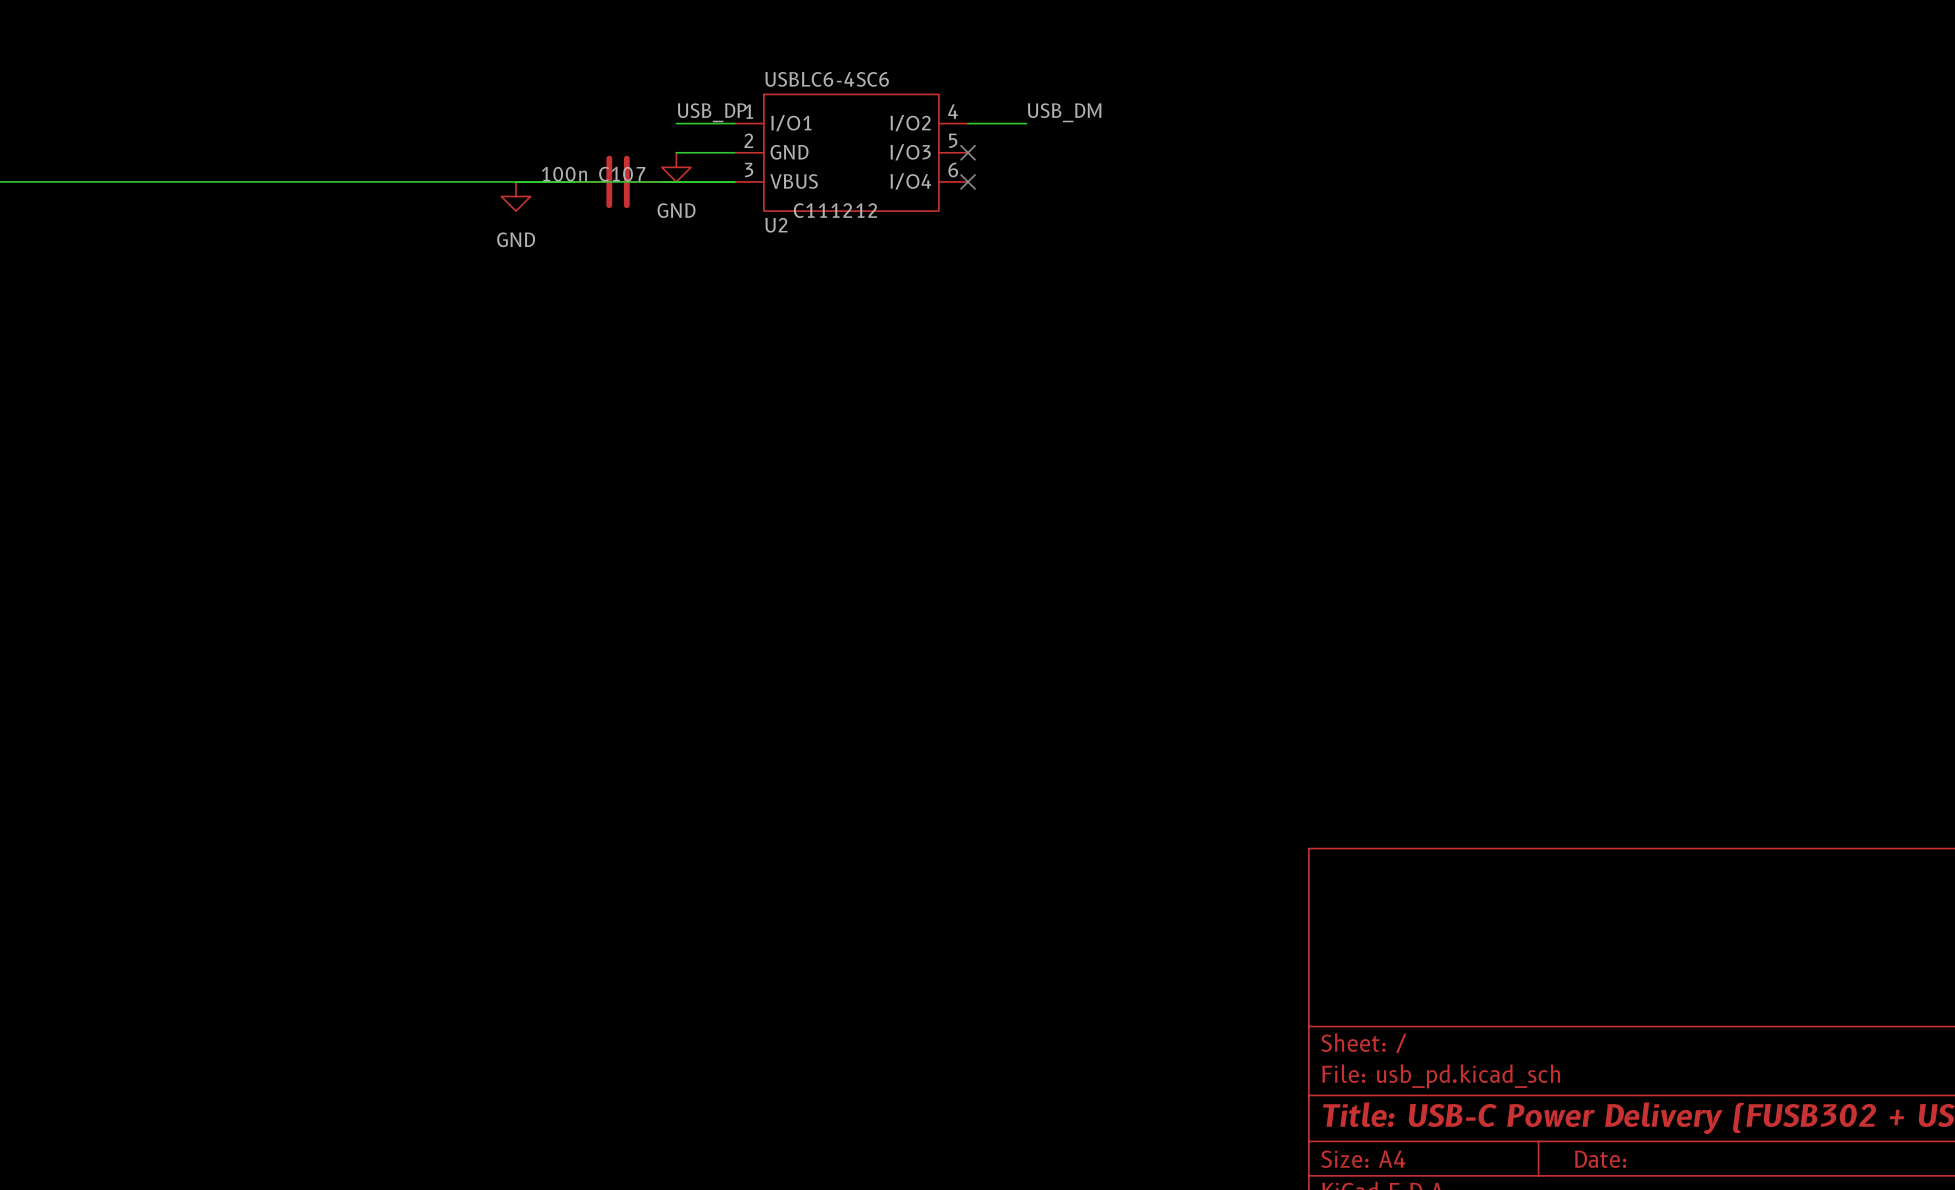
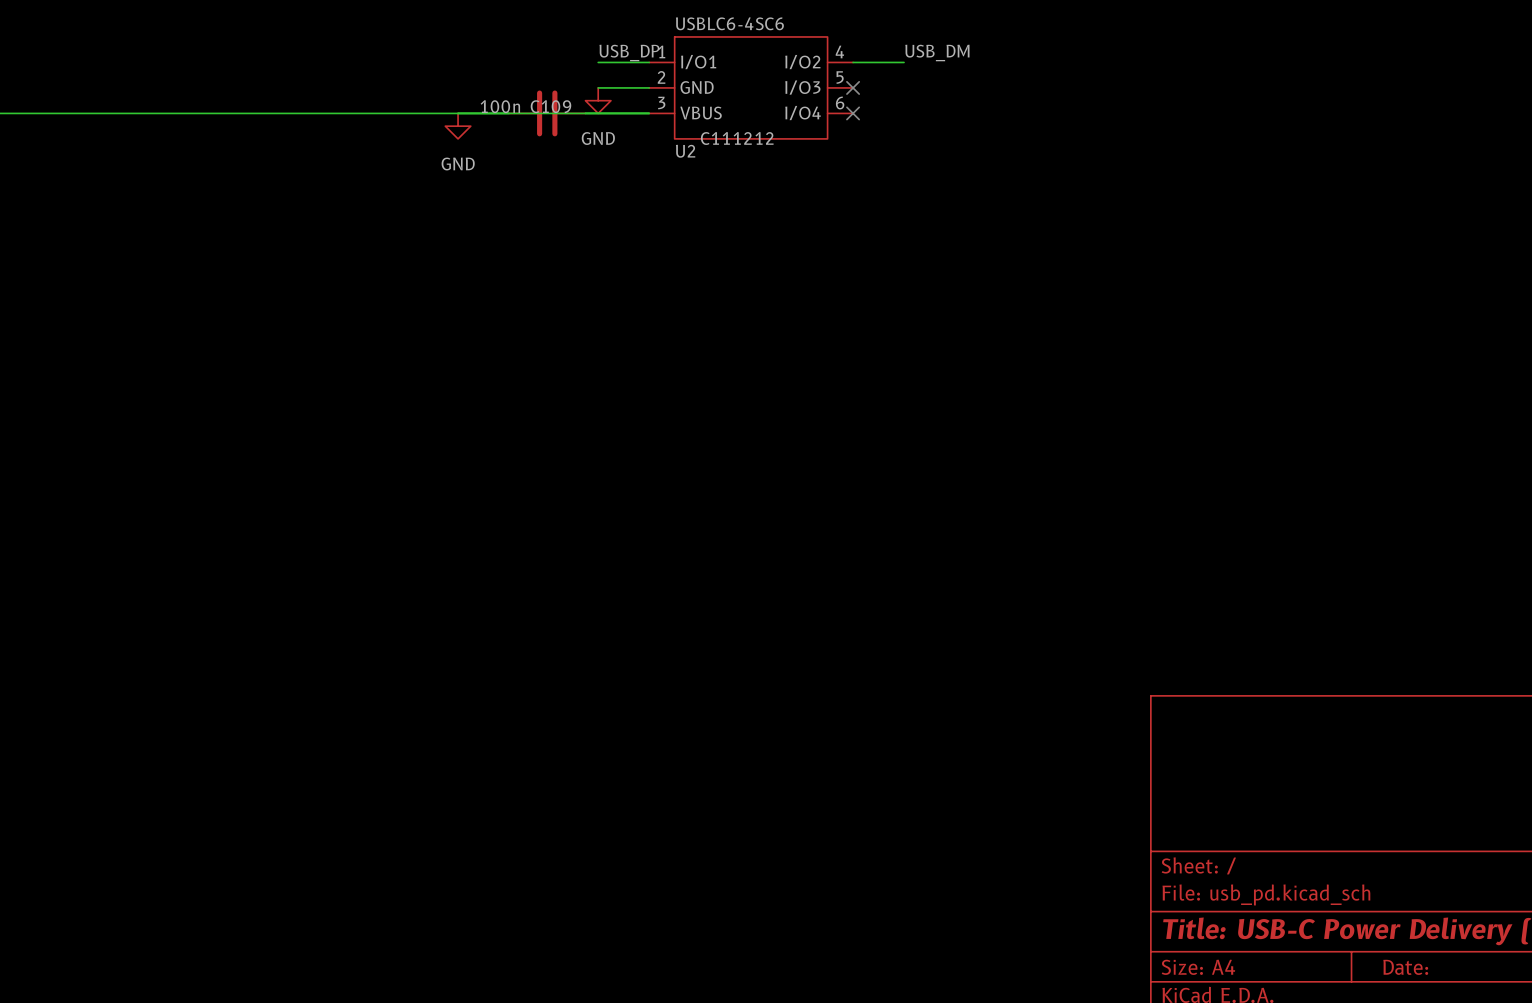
C107 name: C107 (622, 174) -> C109 (550, 106)

